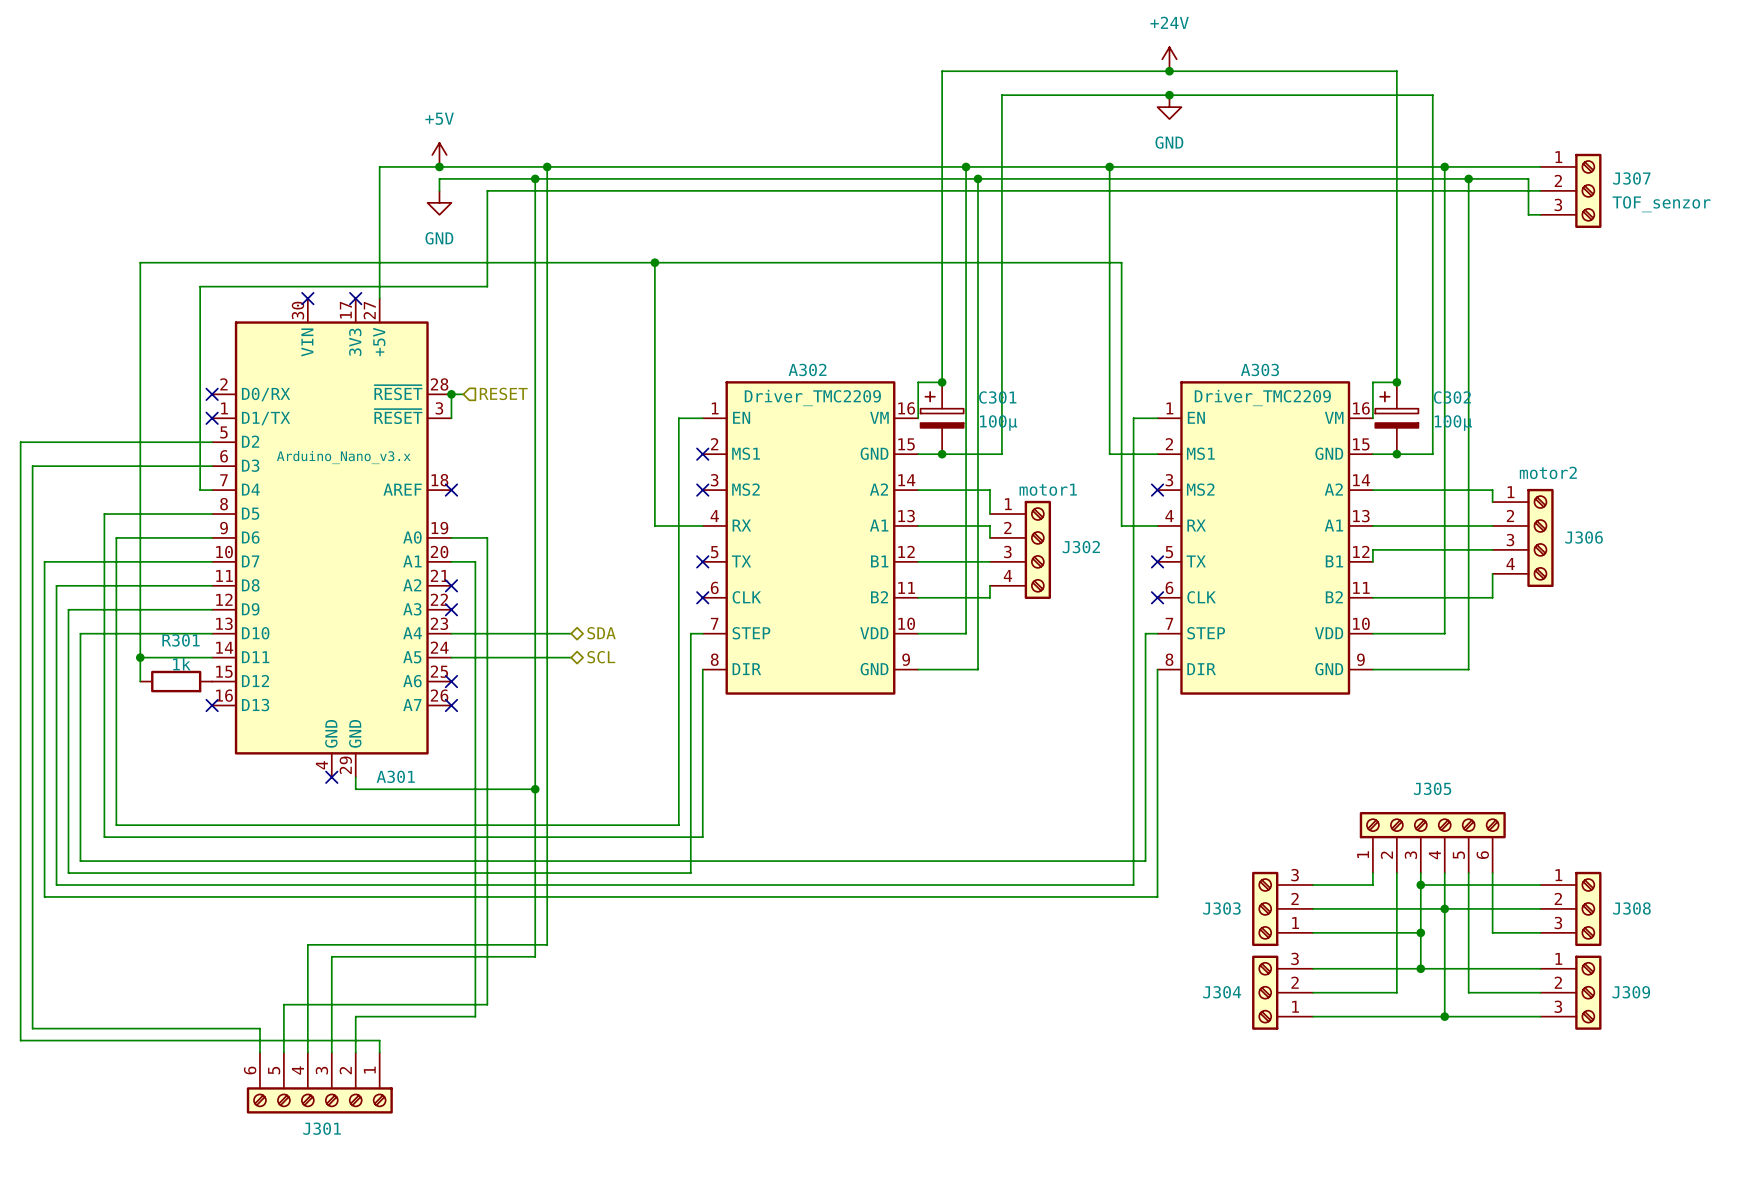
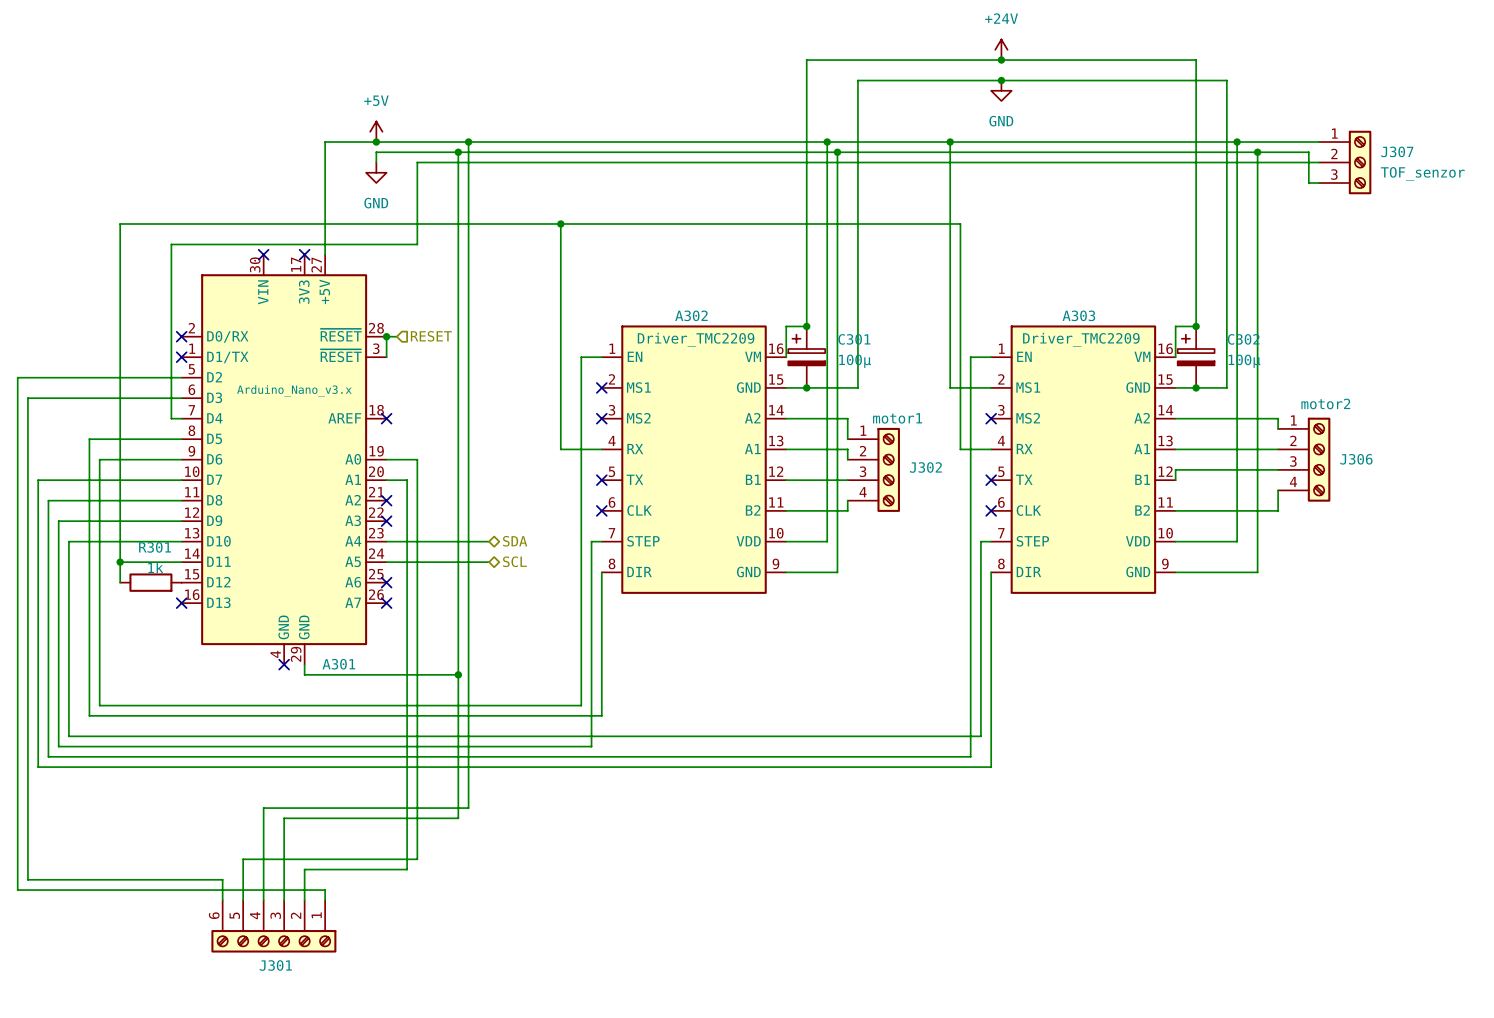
J305: (1432, 842) -> none
wire: (1372, 873) (1372, 885) (1313, 885) -> none
wire: (1396, 873) (1396, 992) (1313, 992) -> none
wire: (1420, 873) (1420, 968) -> none
wire: (1444, 873) (1444, 1016) -> none
wire: (1468, 873) (1468, 992) (1540, 992) -> none
wire: (1492, 873) (1492, 932) (1540, 932) -> none
wire: (1420, 885) (1540, 885) -> none
junction: (1420, 885) -> none
J303: (1282, 908) -> none
wire: (1313, 908) (1540, 908) -> none
junction: (1444, 908) -> none
J308: (1570, 908) -> none
wire: (1313, 932) (1420, 932) -> none
junction: (1420, 932) -> none
wire: (1313, 968) (1540, 968) -> none
junction: (1420, 968) -> none
J304: (1282, 992) -> none
J309: (1570, 992) -> none
wire: (1313, 1016) (1540, 1016) -> none
junction: (1444, 1016) -> none

